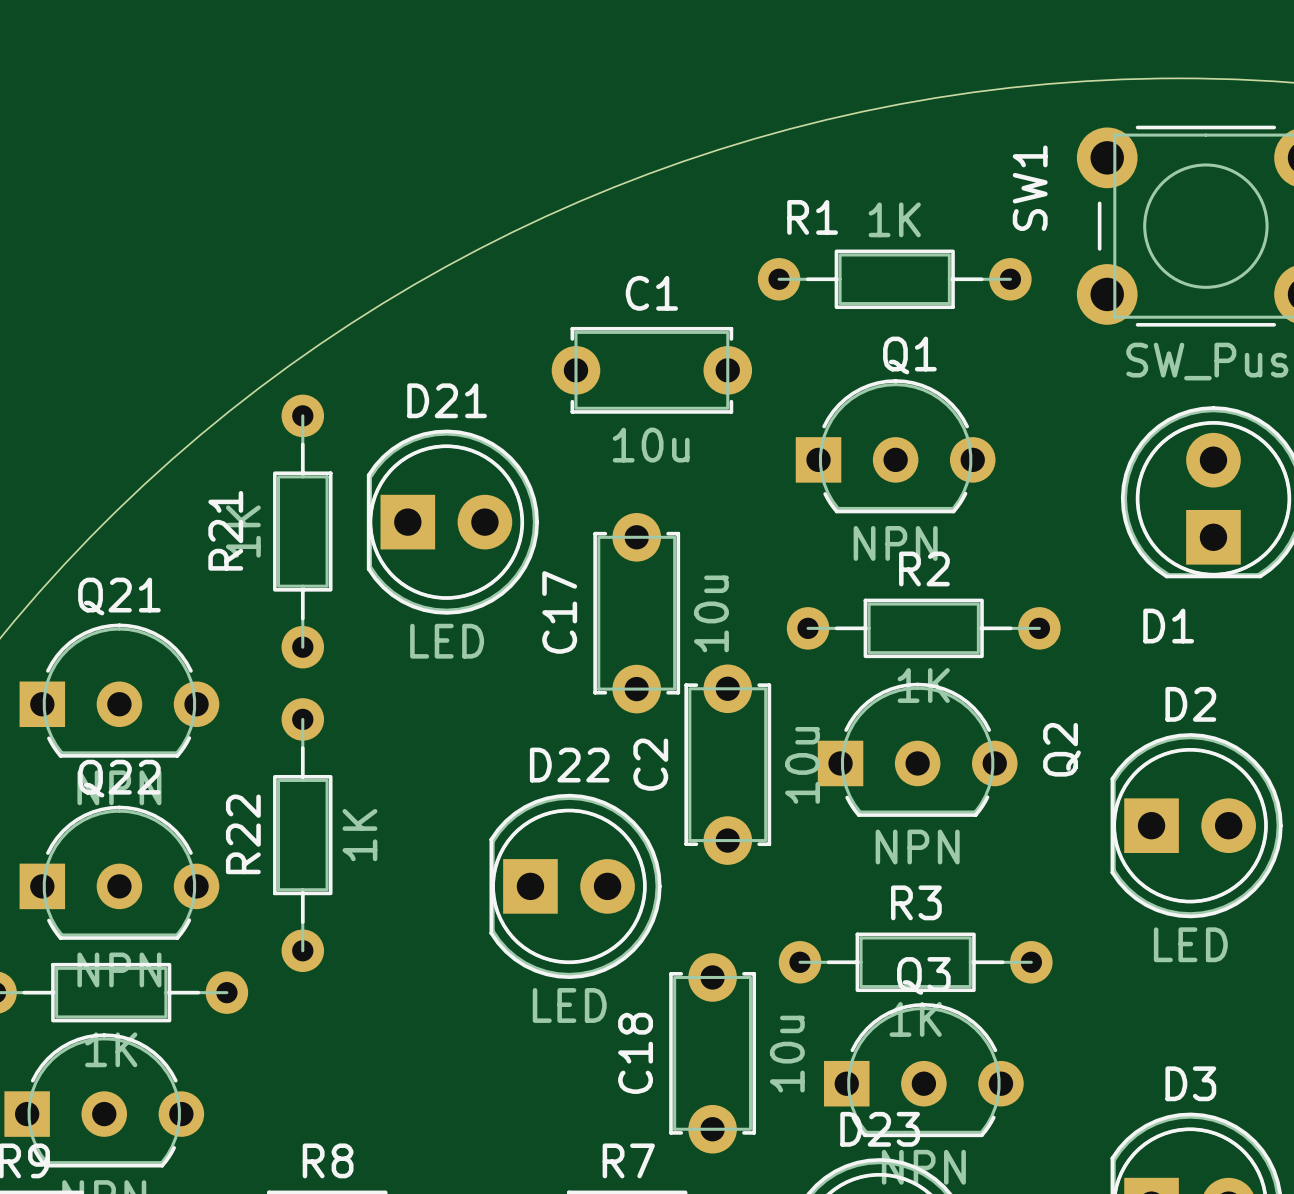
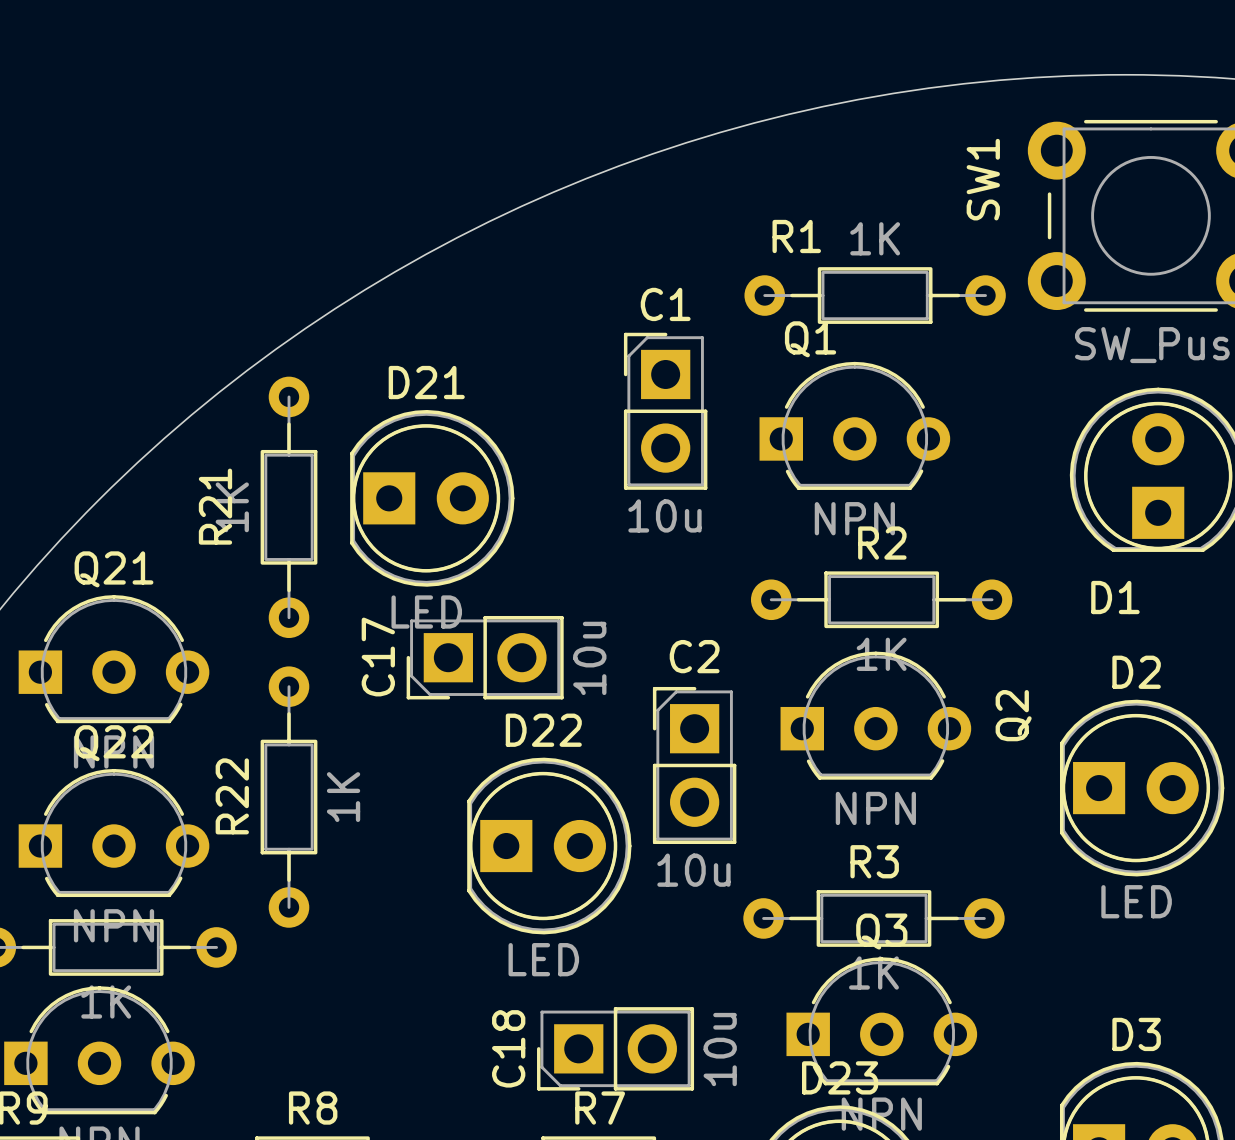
R1 position: (894, 279) -> (875, 295)
C1 footprint: [551, 326, 753, 414] -> [623, 332, 708, 490]
Q1 name position: Q1 (909, 355) -> Q1 (810, 339)
C17 footprint: [593, 513, 681, 714] -> [406, 615, 564, 700]
C2 footprint: [684, 664, 772, 865] -> [652, 686, 737, 845]
C2 name position: C2 (650, 764) -> C2 (694, 656)
C2 value position: 10u (802, 765) -> 10u (693, 870)
C18 footprint: [669, 953, 757, 1154] -> [537, 1007, 695, 1091]

